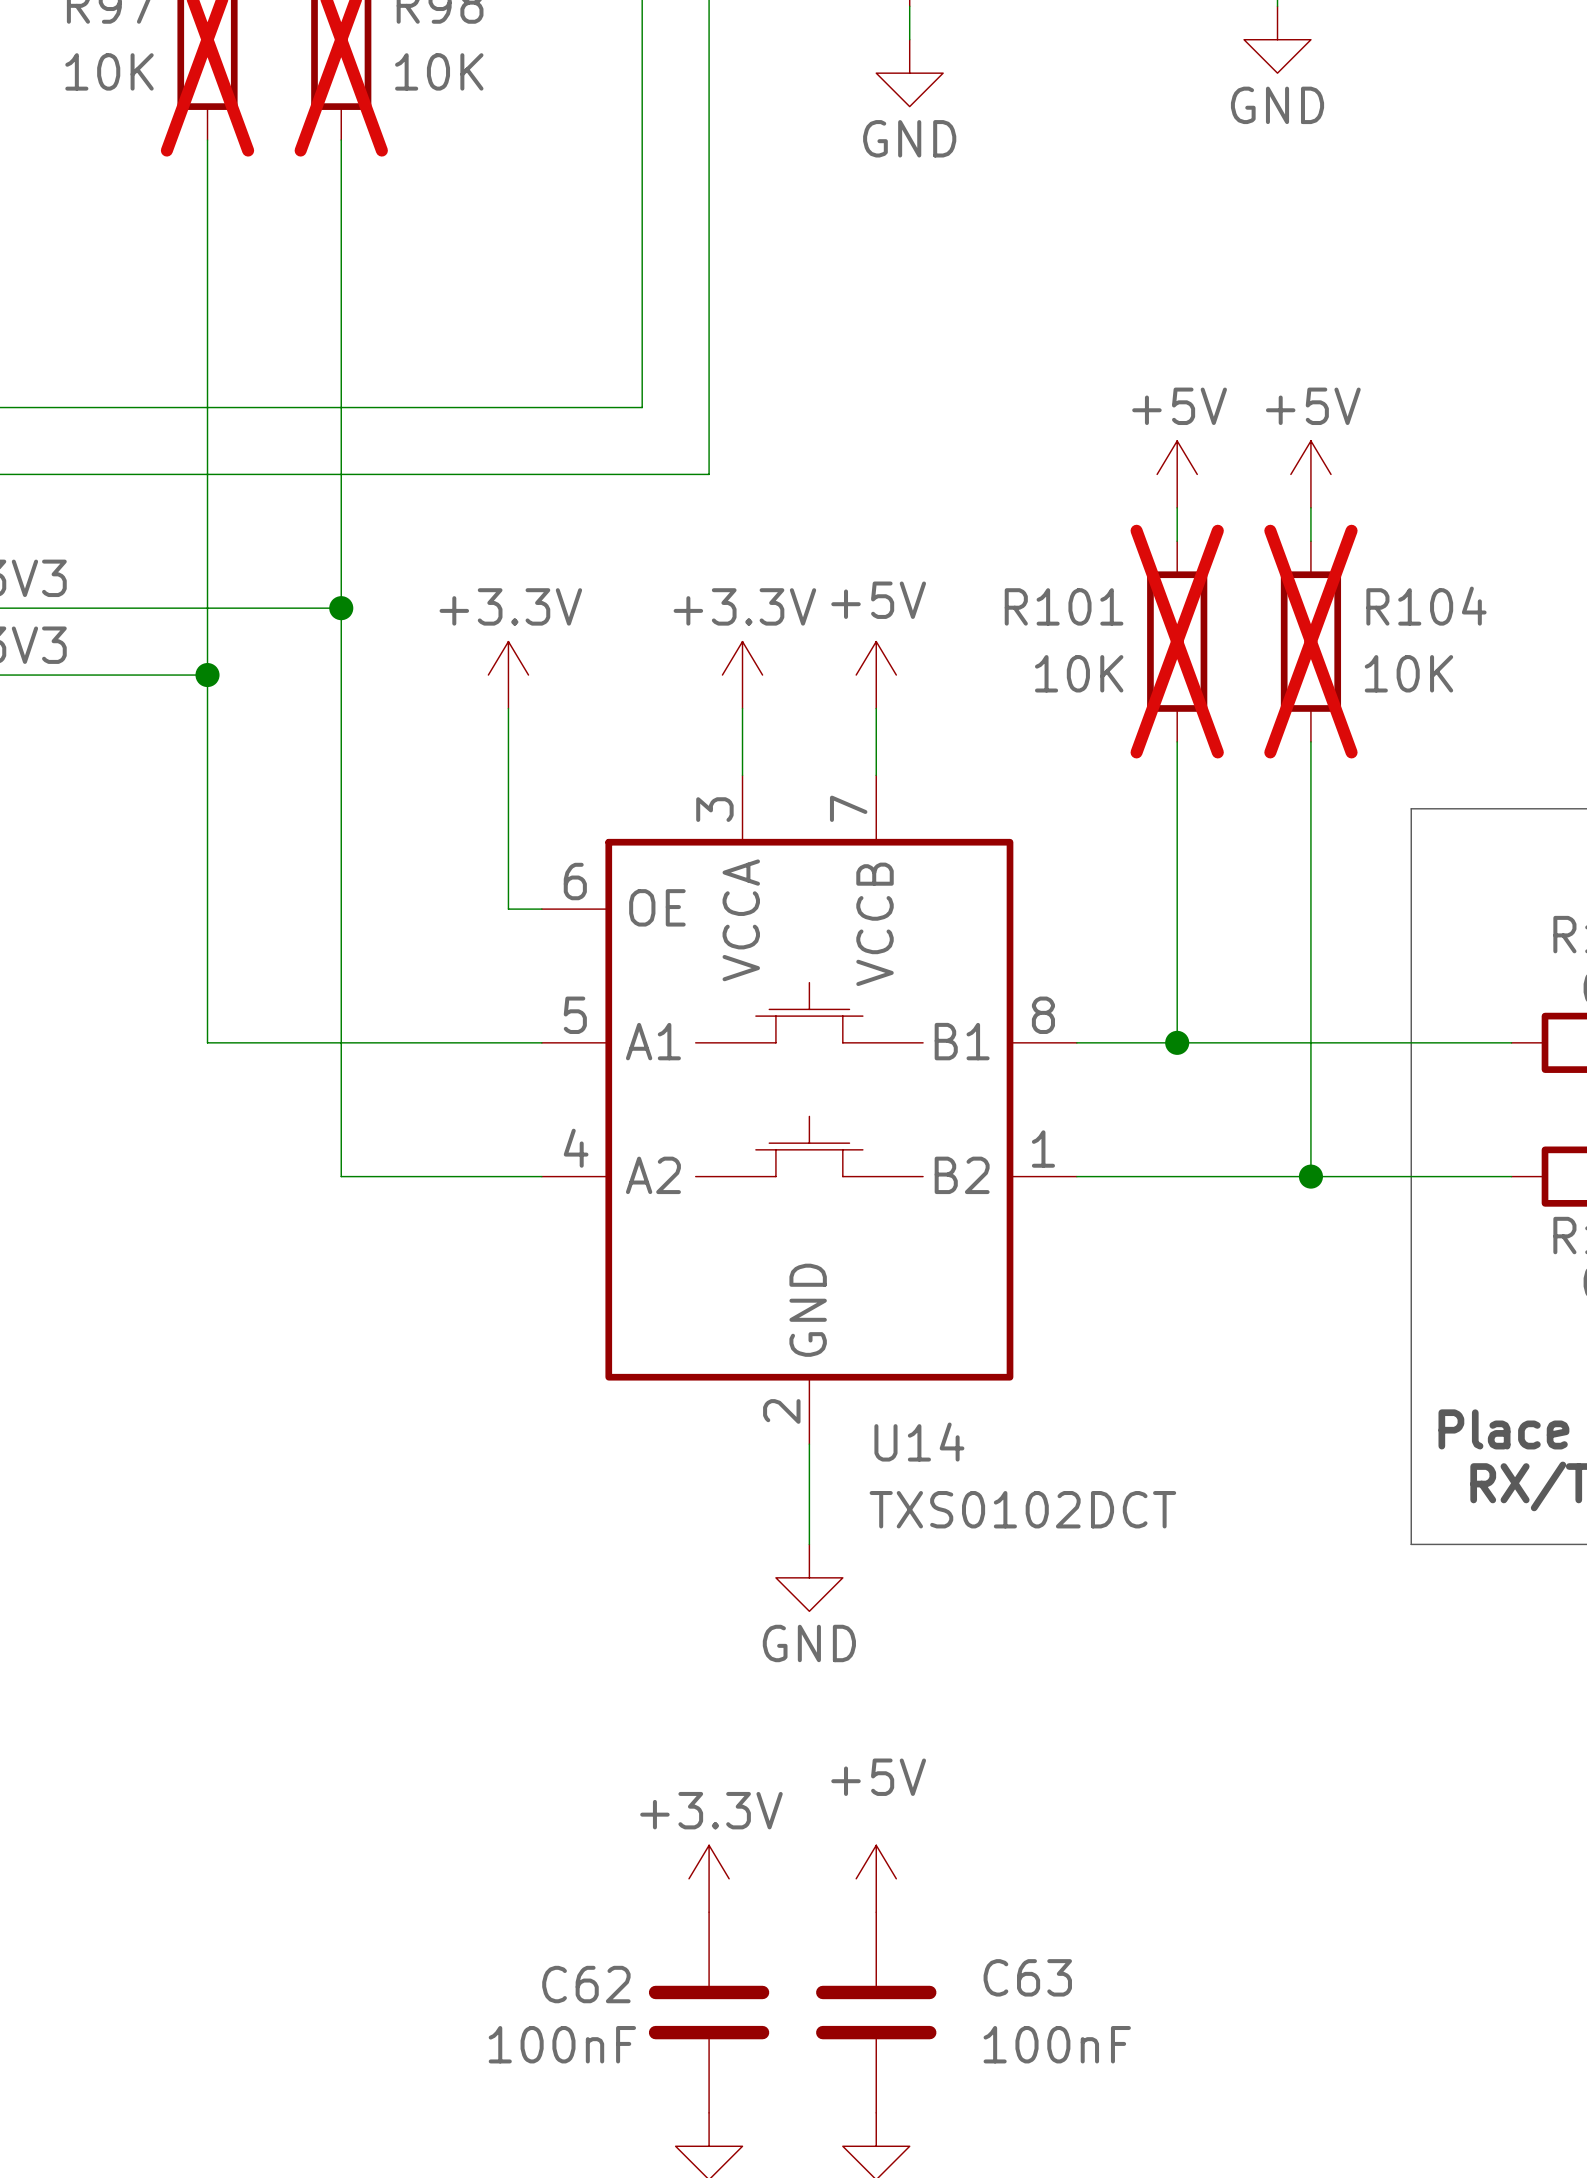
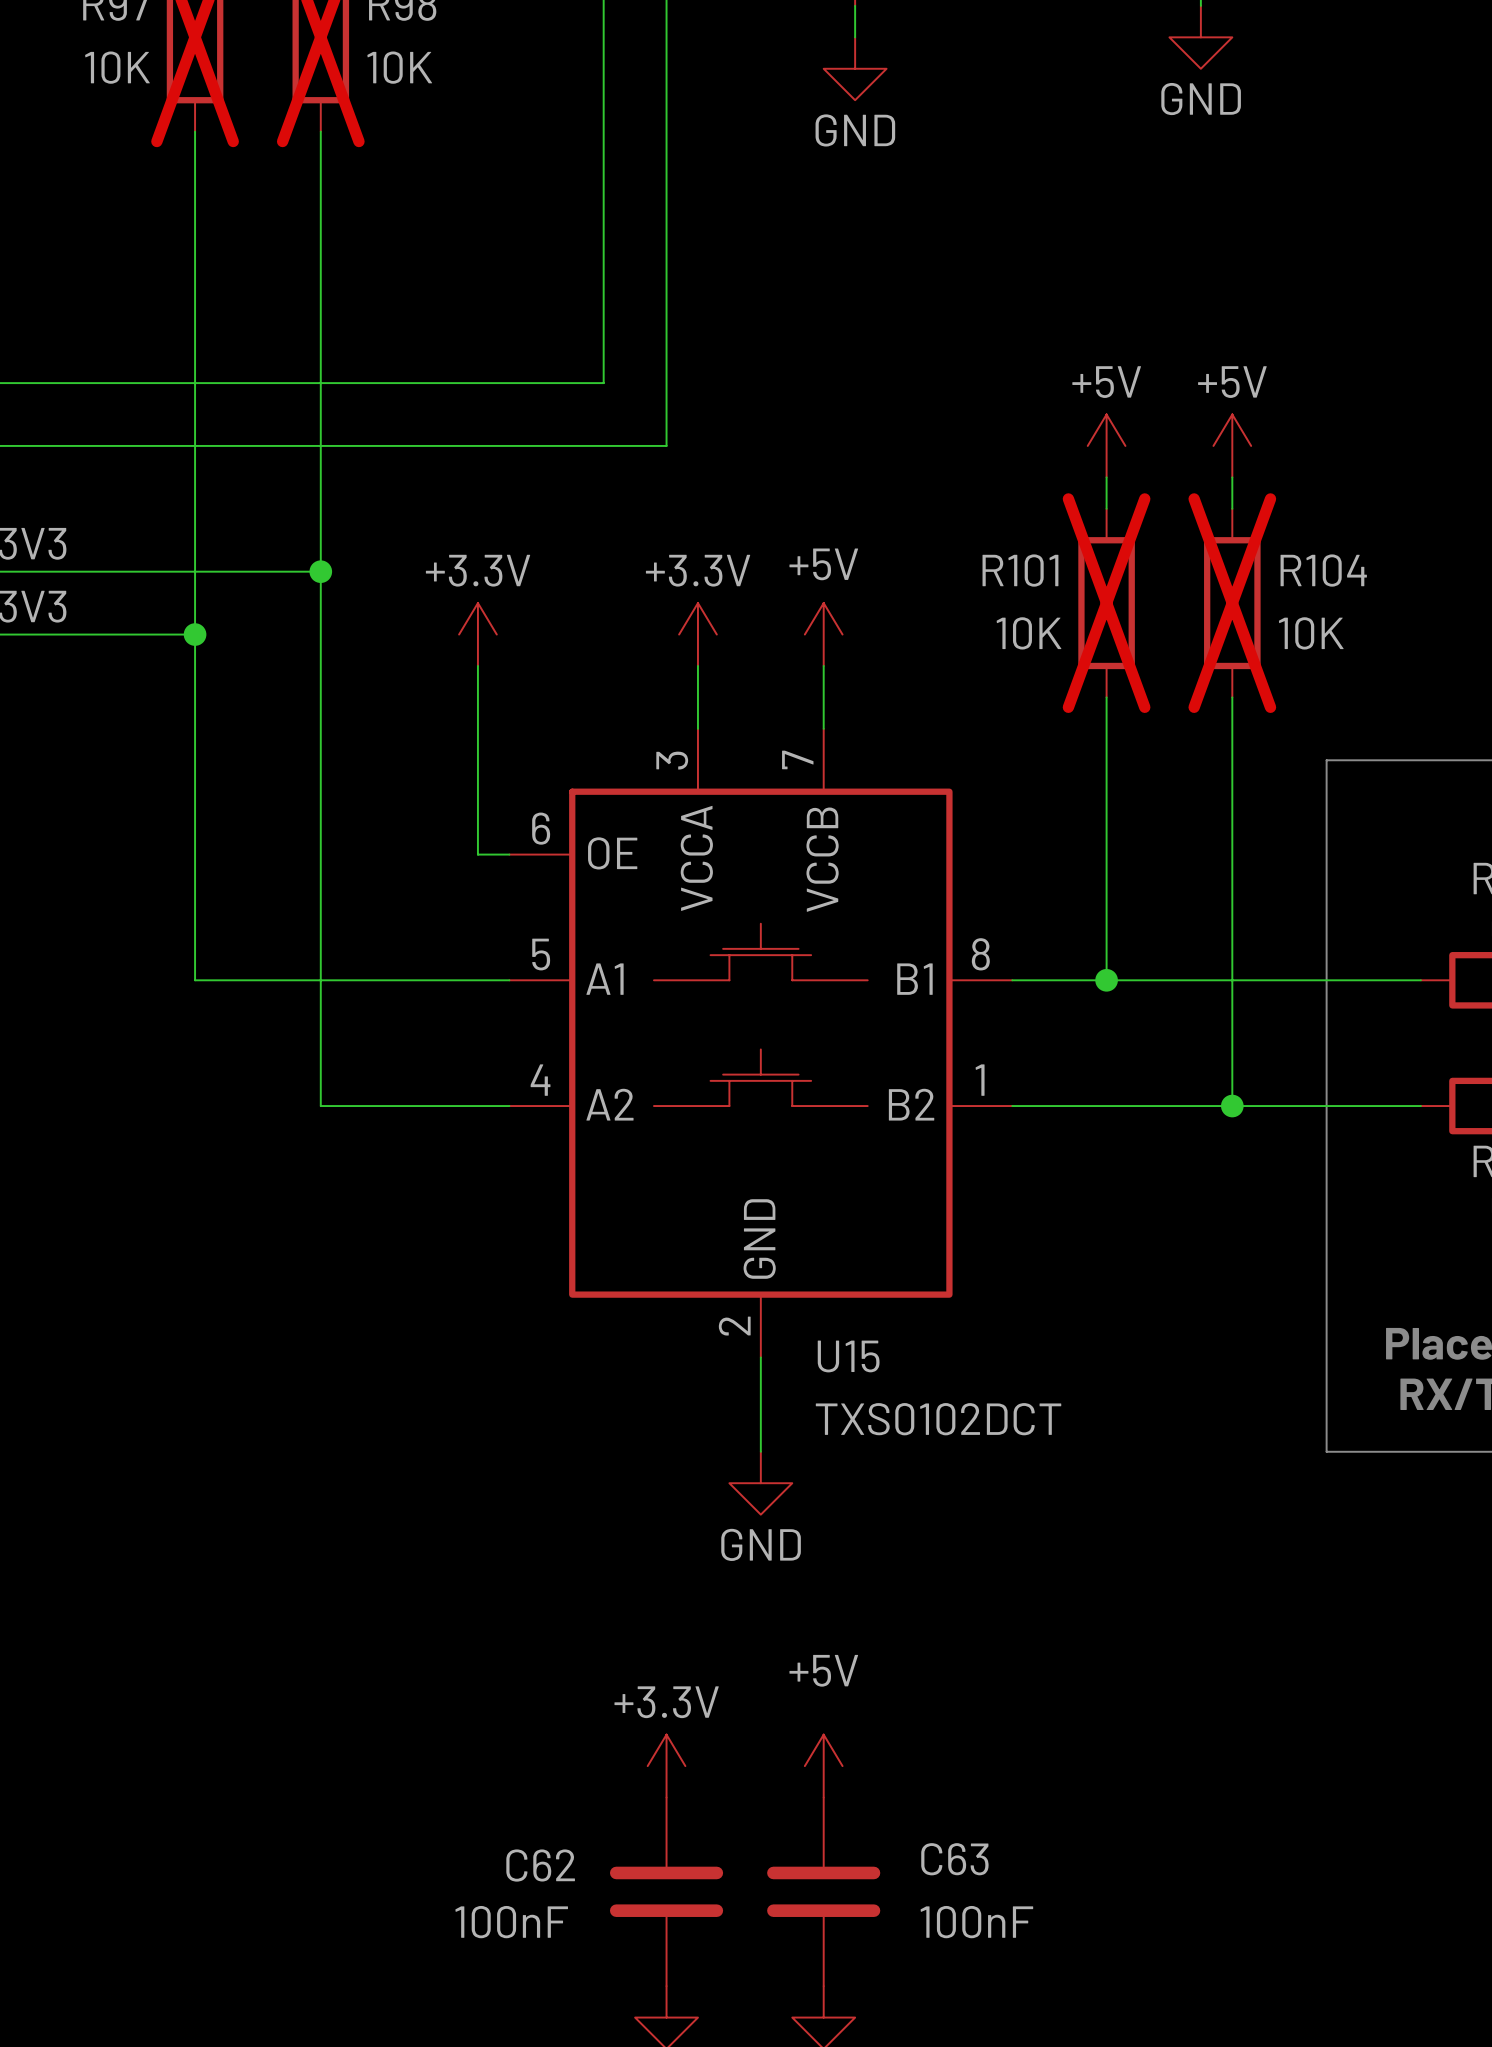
U14 name: U14 (919, 1442) -> U15 (848, 1356)

